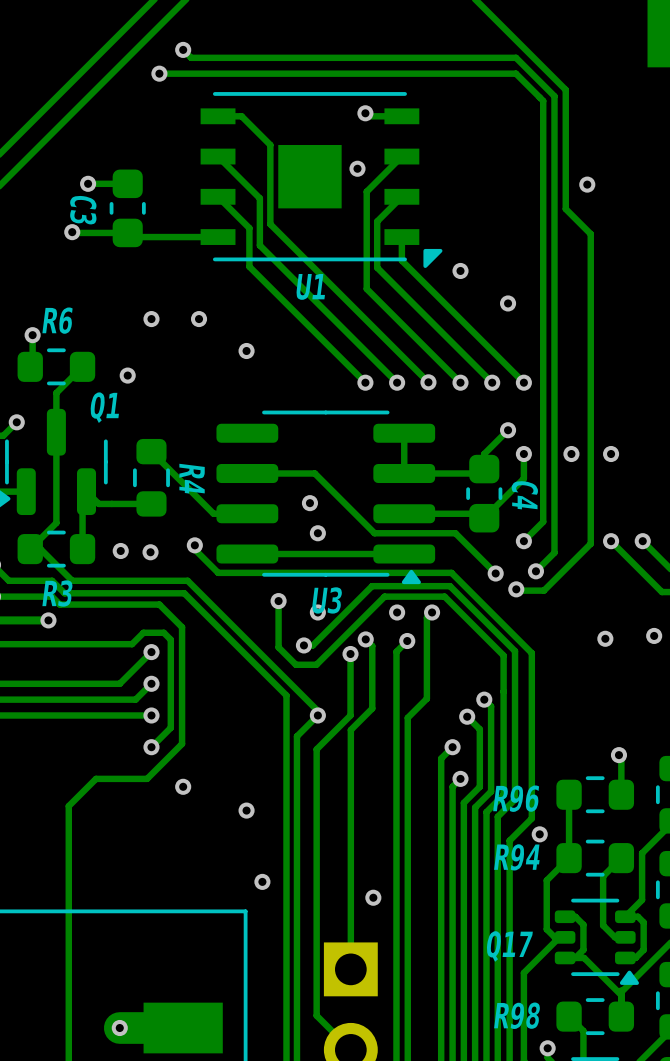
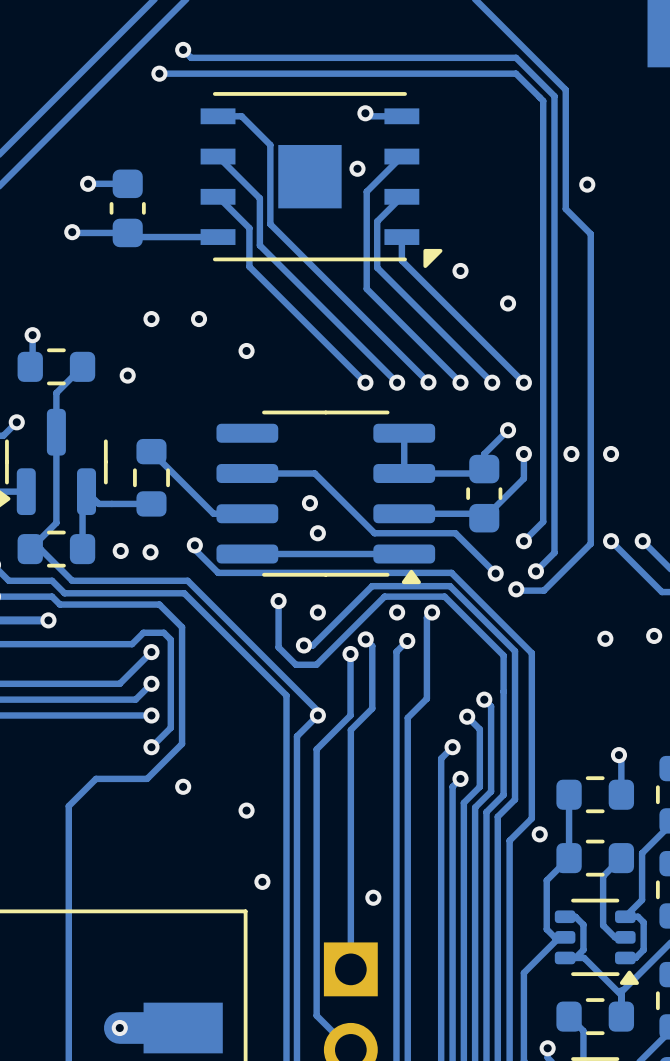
C3 name: C3 (83, 210) -> none
U1 name: U1 (310, 286) -> none
R6 name: R6 (57, 320) -> none
Q1 name: Q1 (104, 407) -> none
R4 name: R4 (192, 478) -> none
C4 name: C4 (524, 495) -> none
R3 name: R3 (57, 593) -> none
U3 name: U3 (327, 600) -> none
R96 name: R96 (516, 798) -> none
R94 name: R94 (516, 857) -> none
Q17 name: Q17 (509, 946) -> none
R98 name: R98 (517, 1015) -> none

